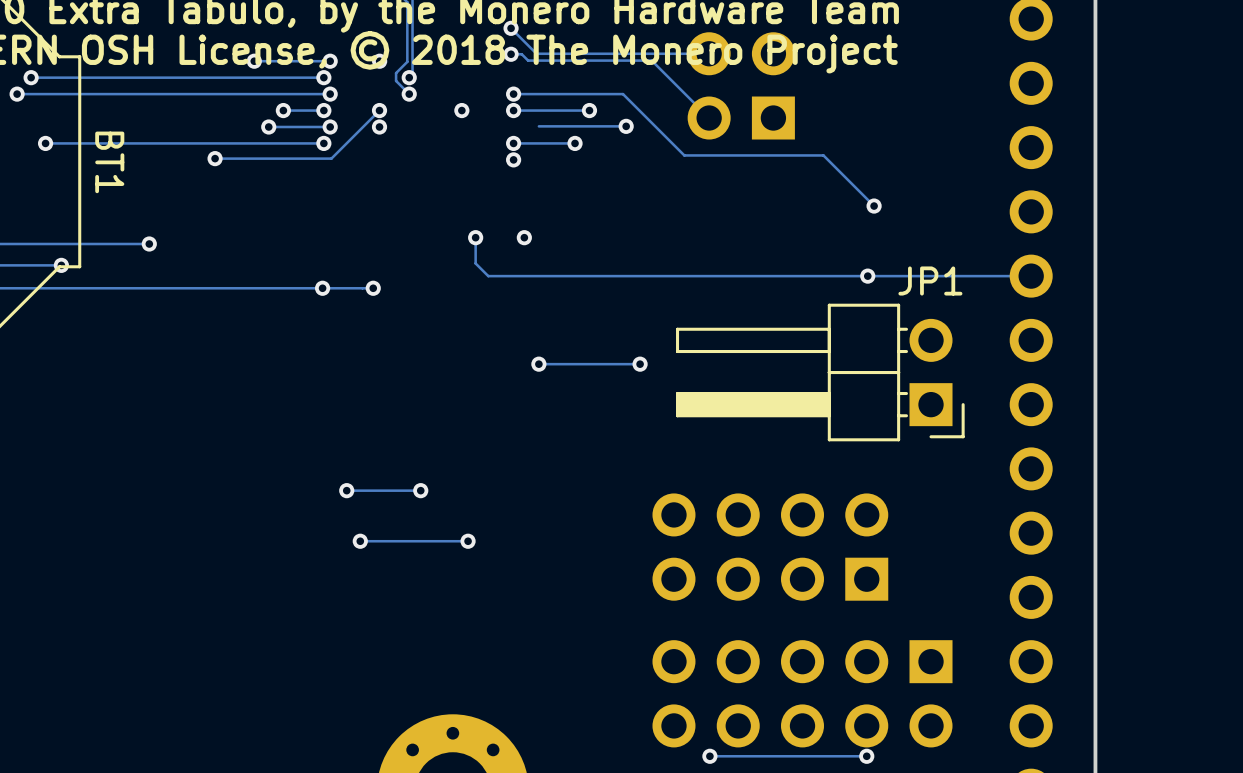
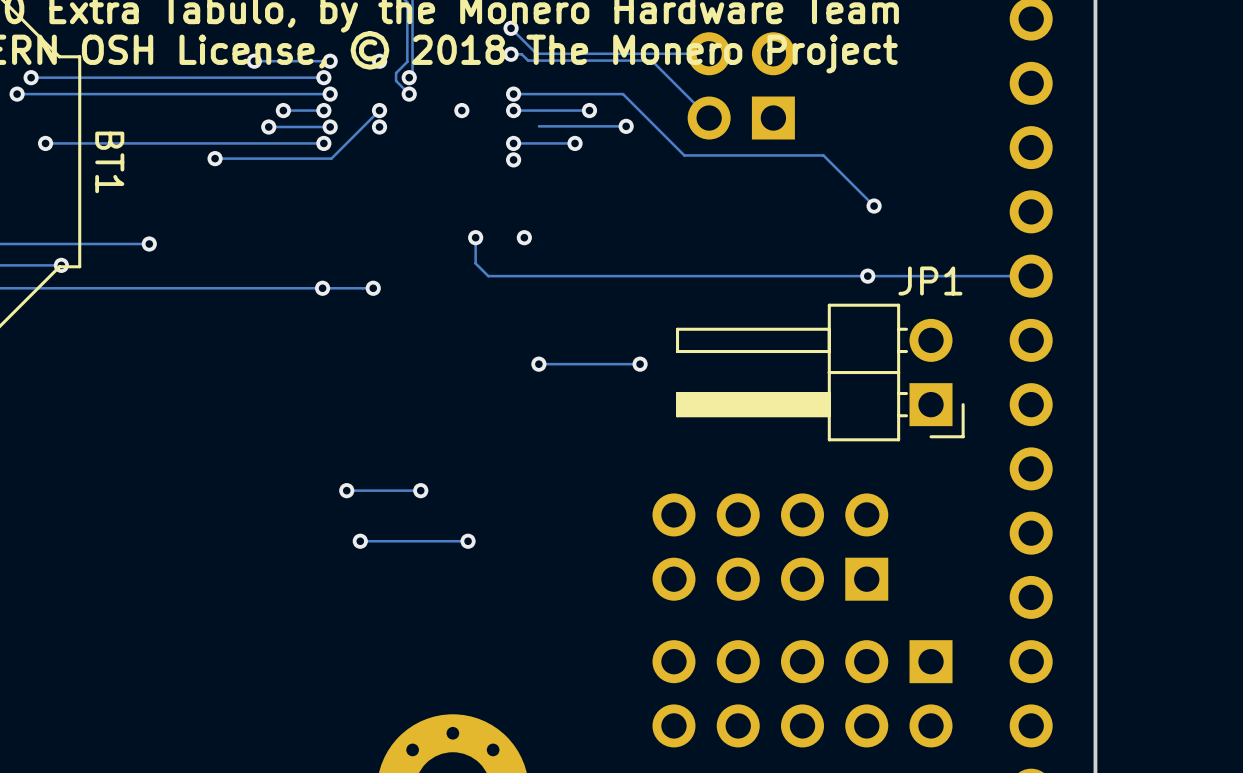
via: (709, 756) -> none
track: (866, 756) (709, 756) -> none
via: (866, 756) -> none

